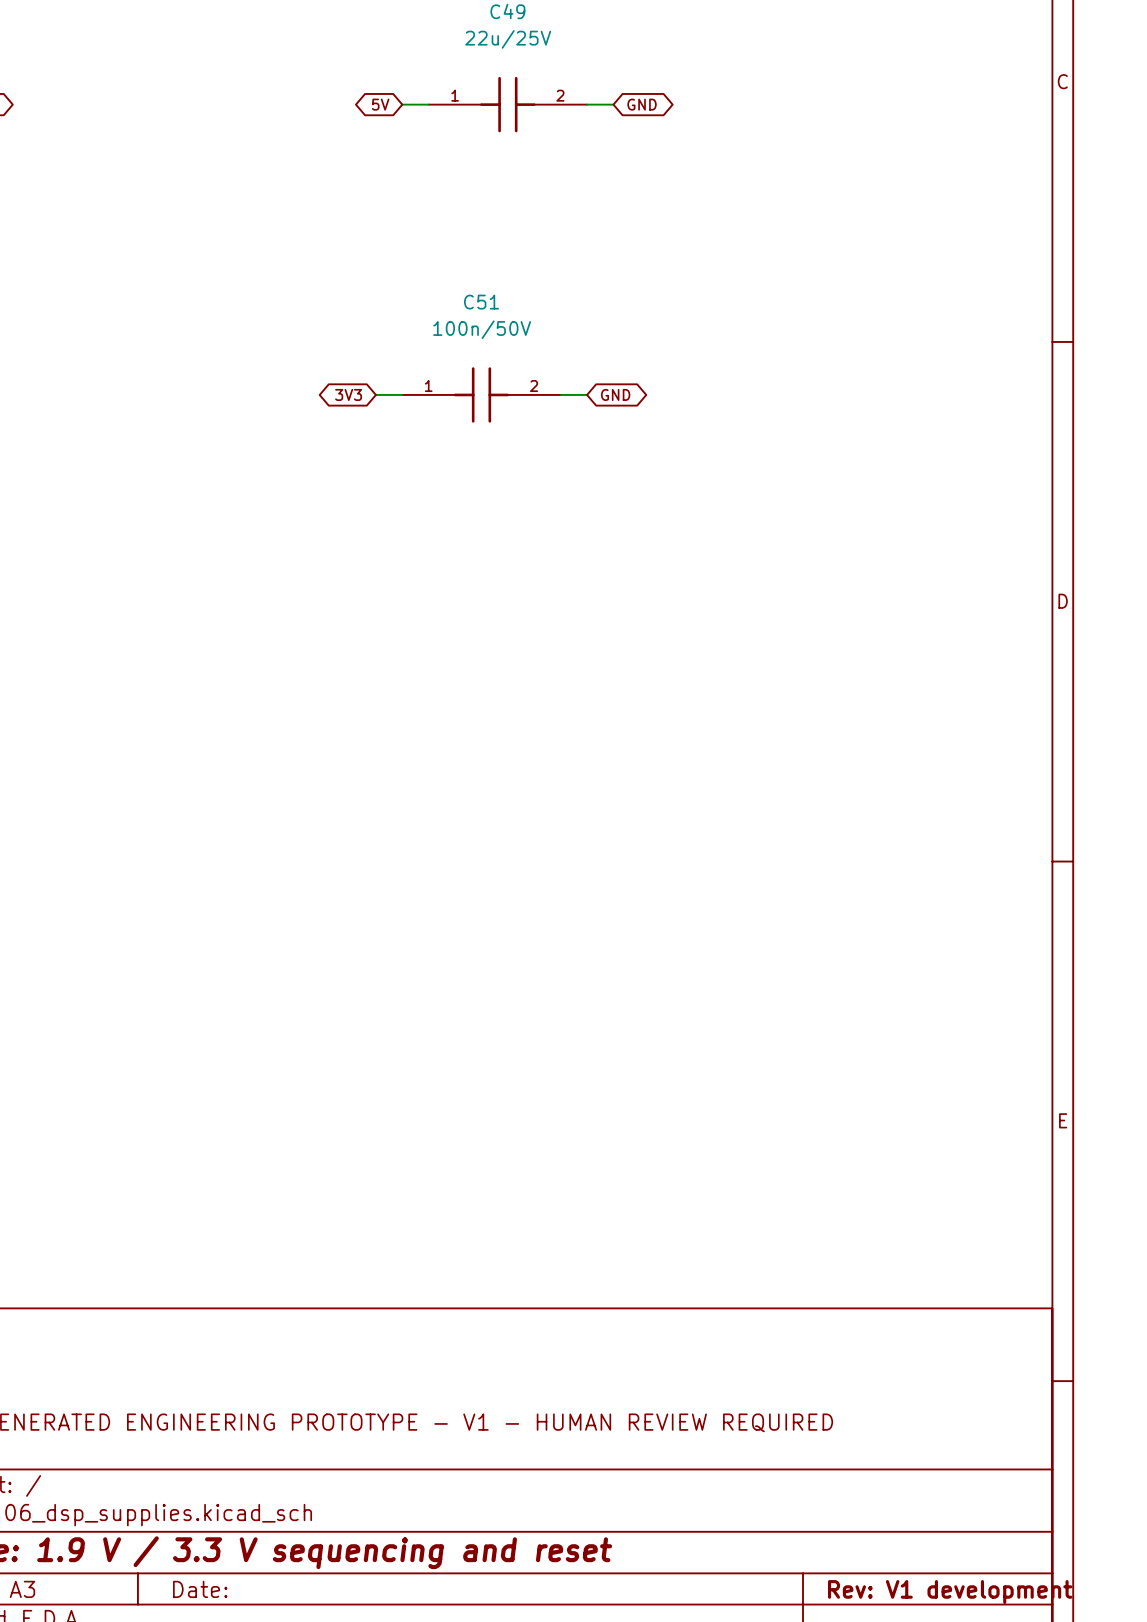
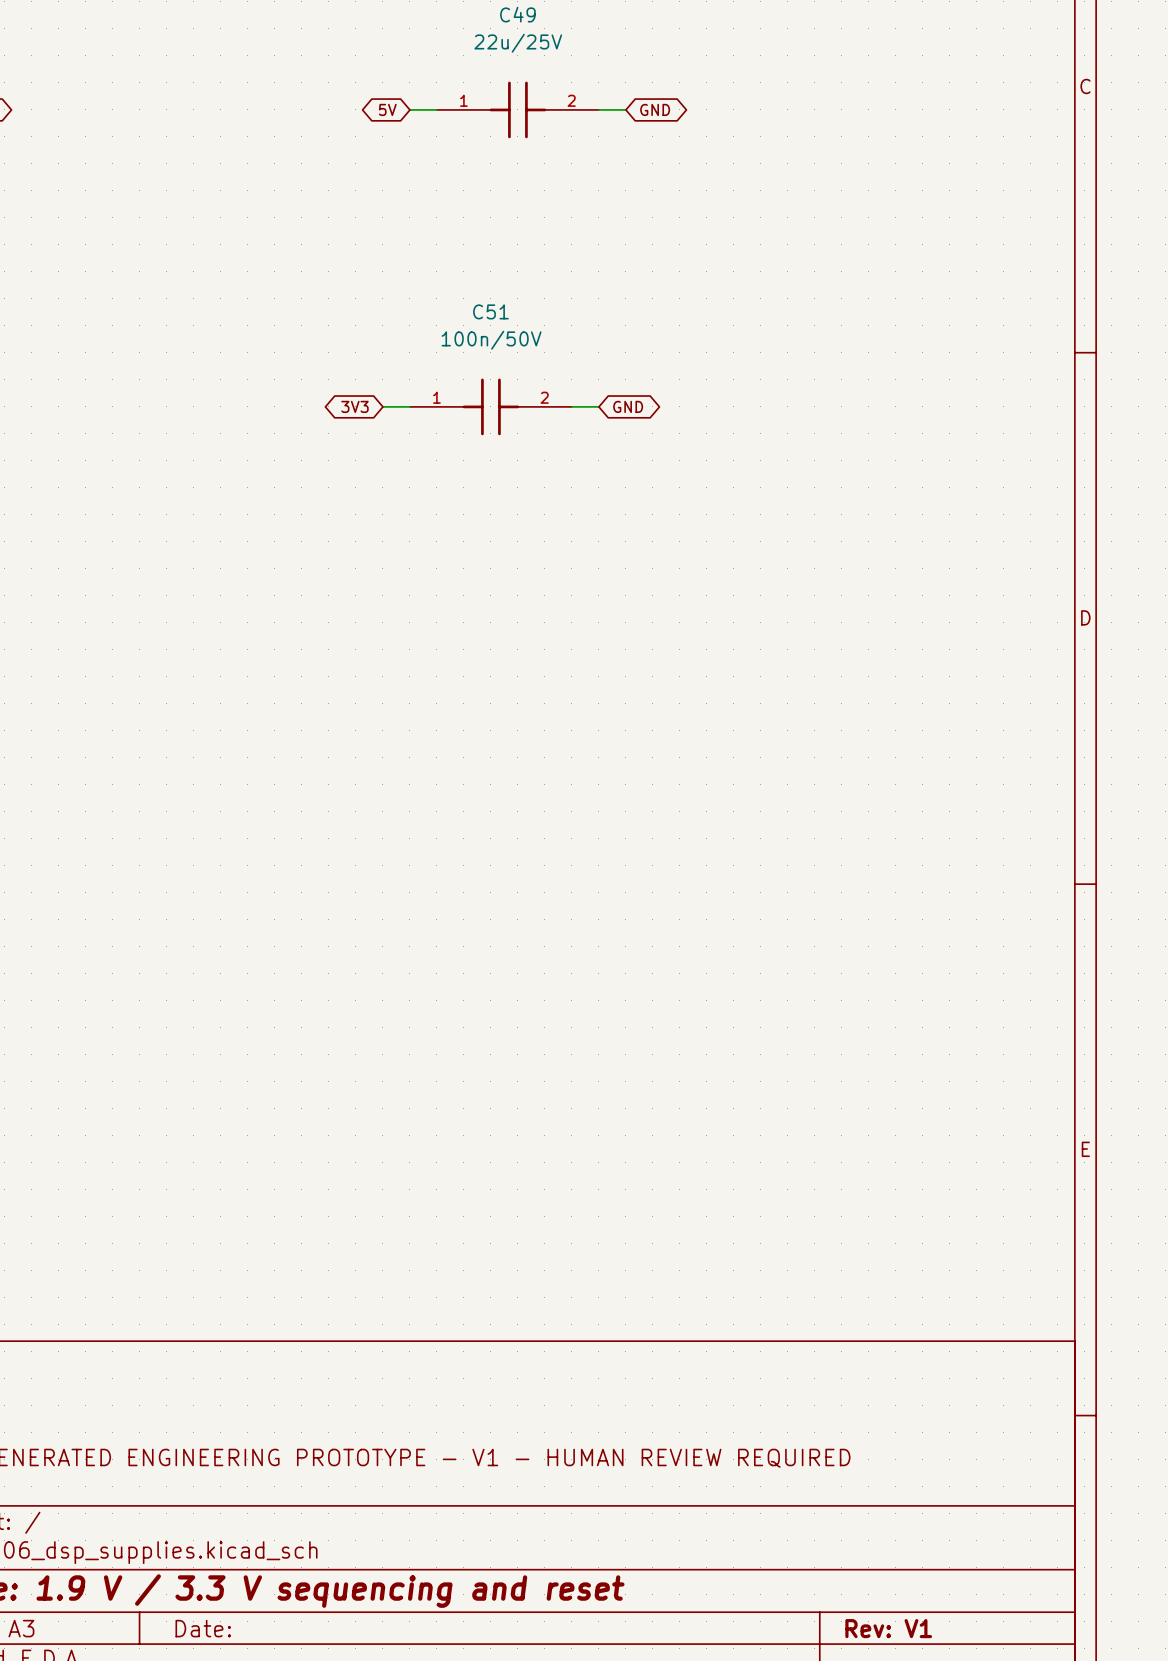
title block: Rev: V1 development (950, 1592) -> Rev: V1 (888, 1628)

